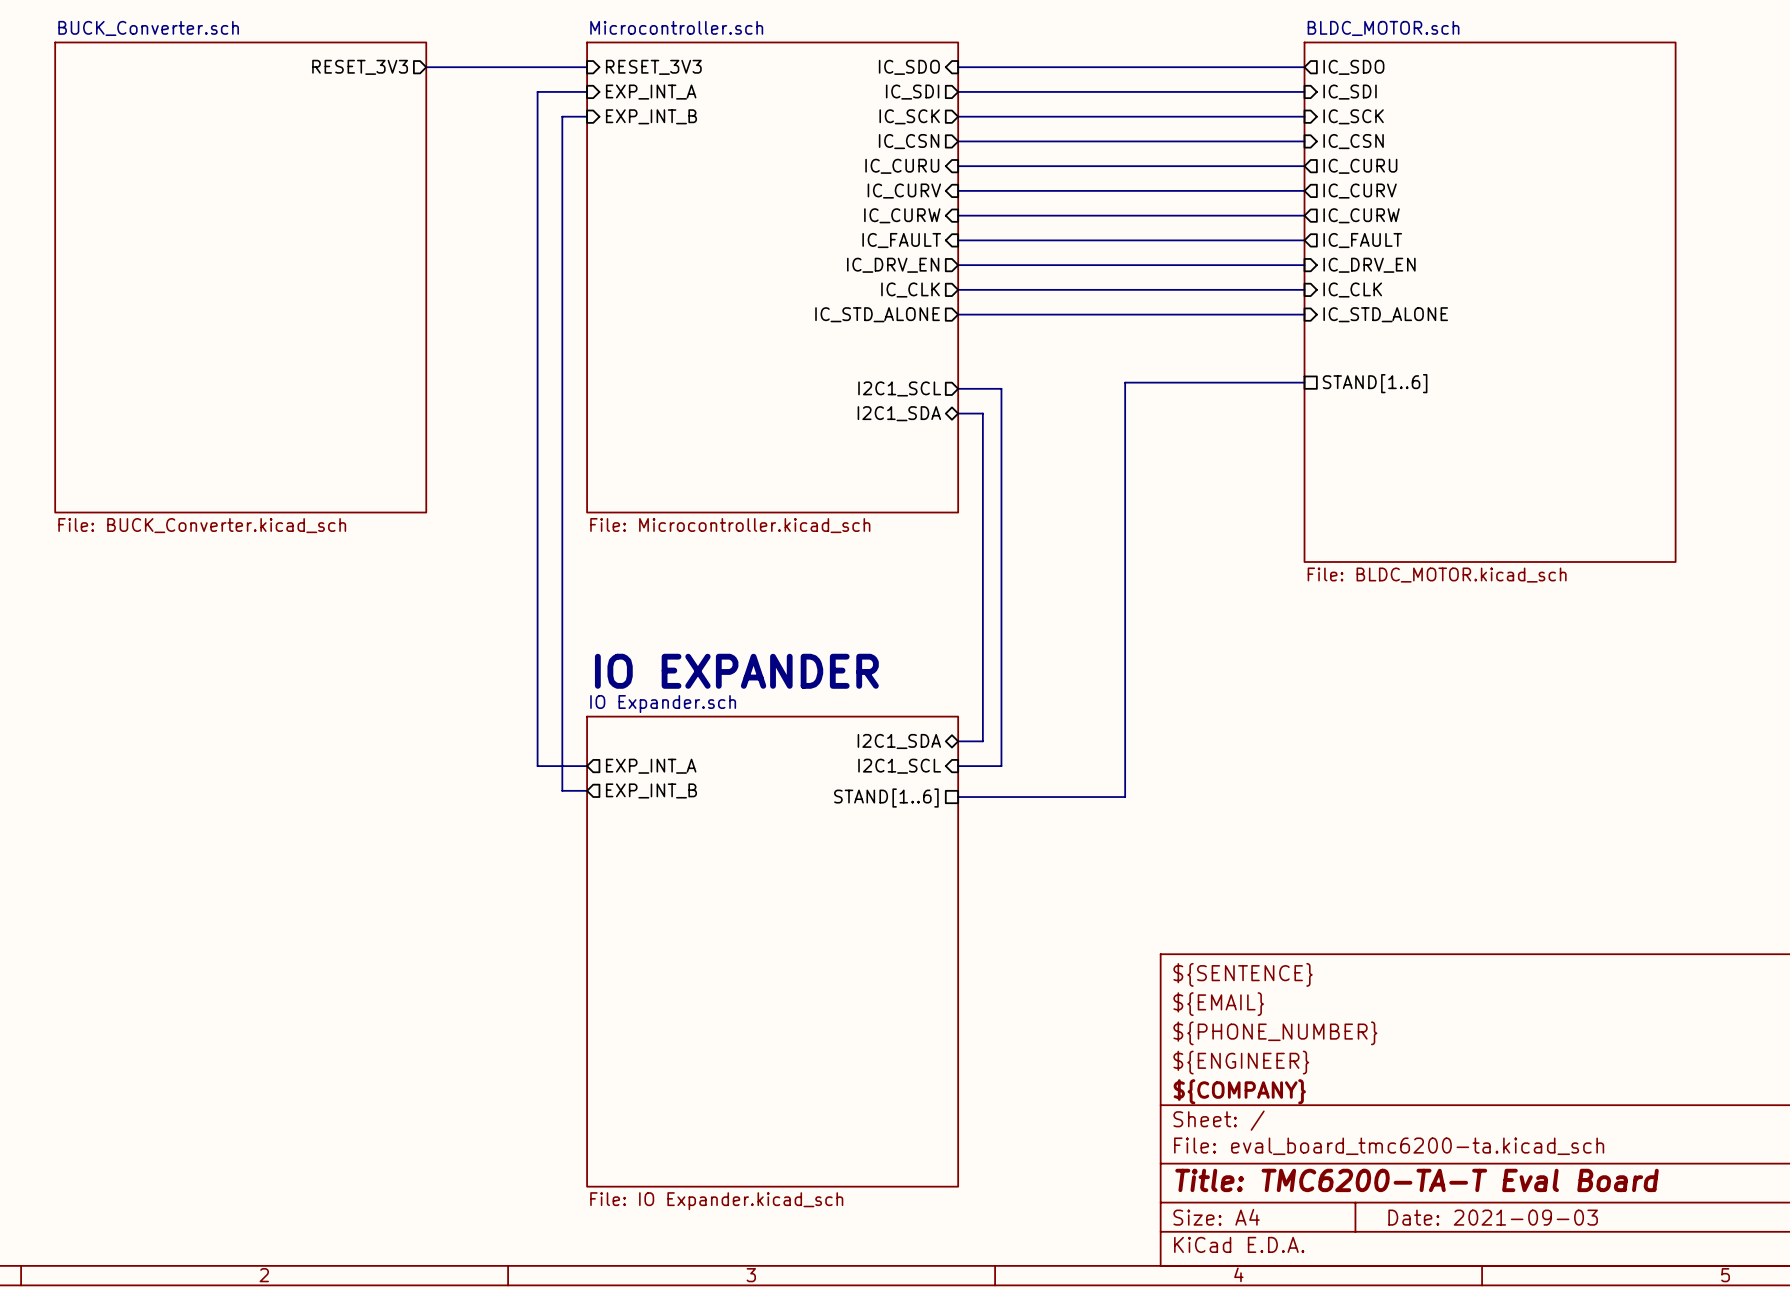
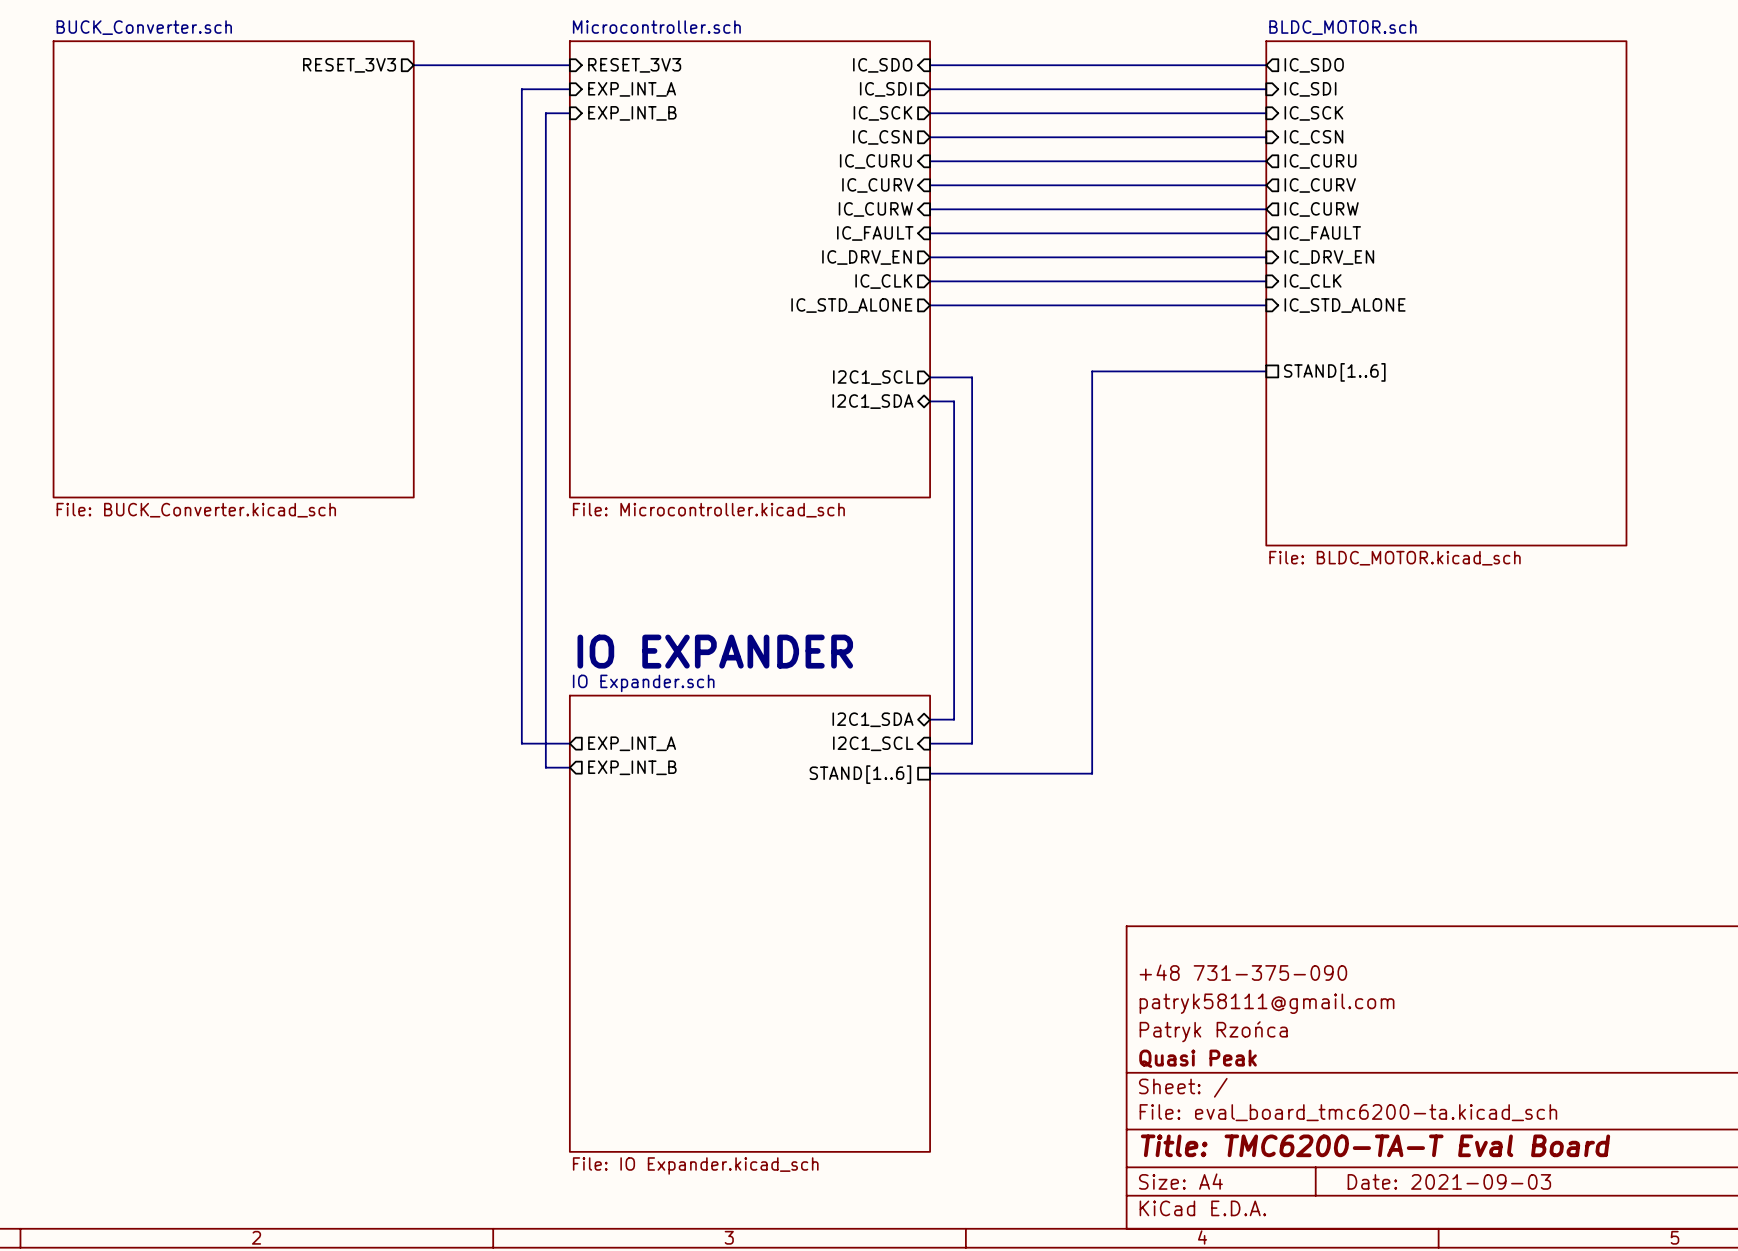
title block: ${SENTENCE} (1243, 974) -> none
title block: ${EMAIL} (1218, 1004) -> +48 731-375-090 (1243, 972)
title block: ${PHONE_NUMBER} (1275, 1033) -> patryk58111@gmail.com (1267, 1003)
title block: ${ENGINEER} (1241, 1062) -> Patryk Rzońca (1213, 1031)
title block: ${COMPANY} (1239, 1091) -> Quasi Peak (1198, 1058)

